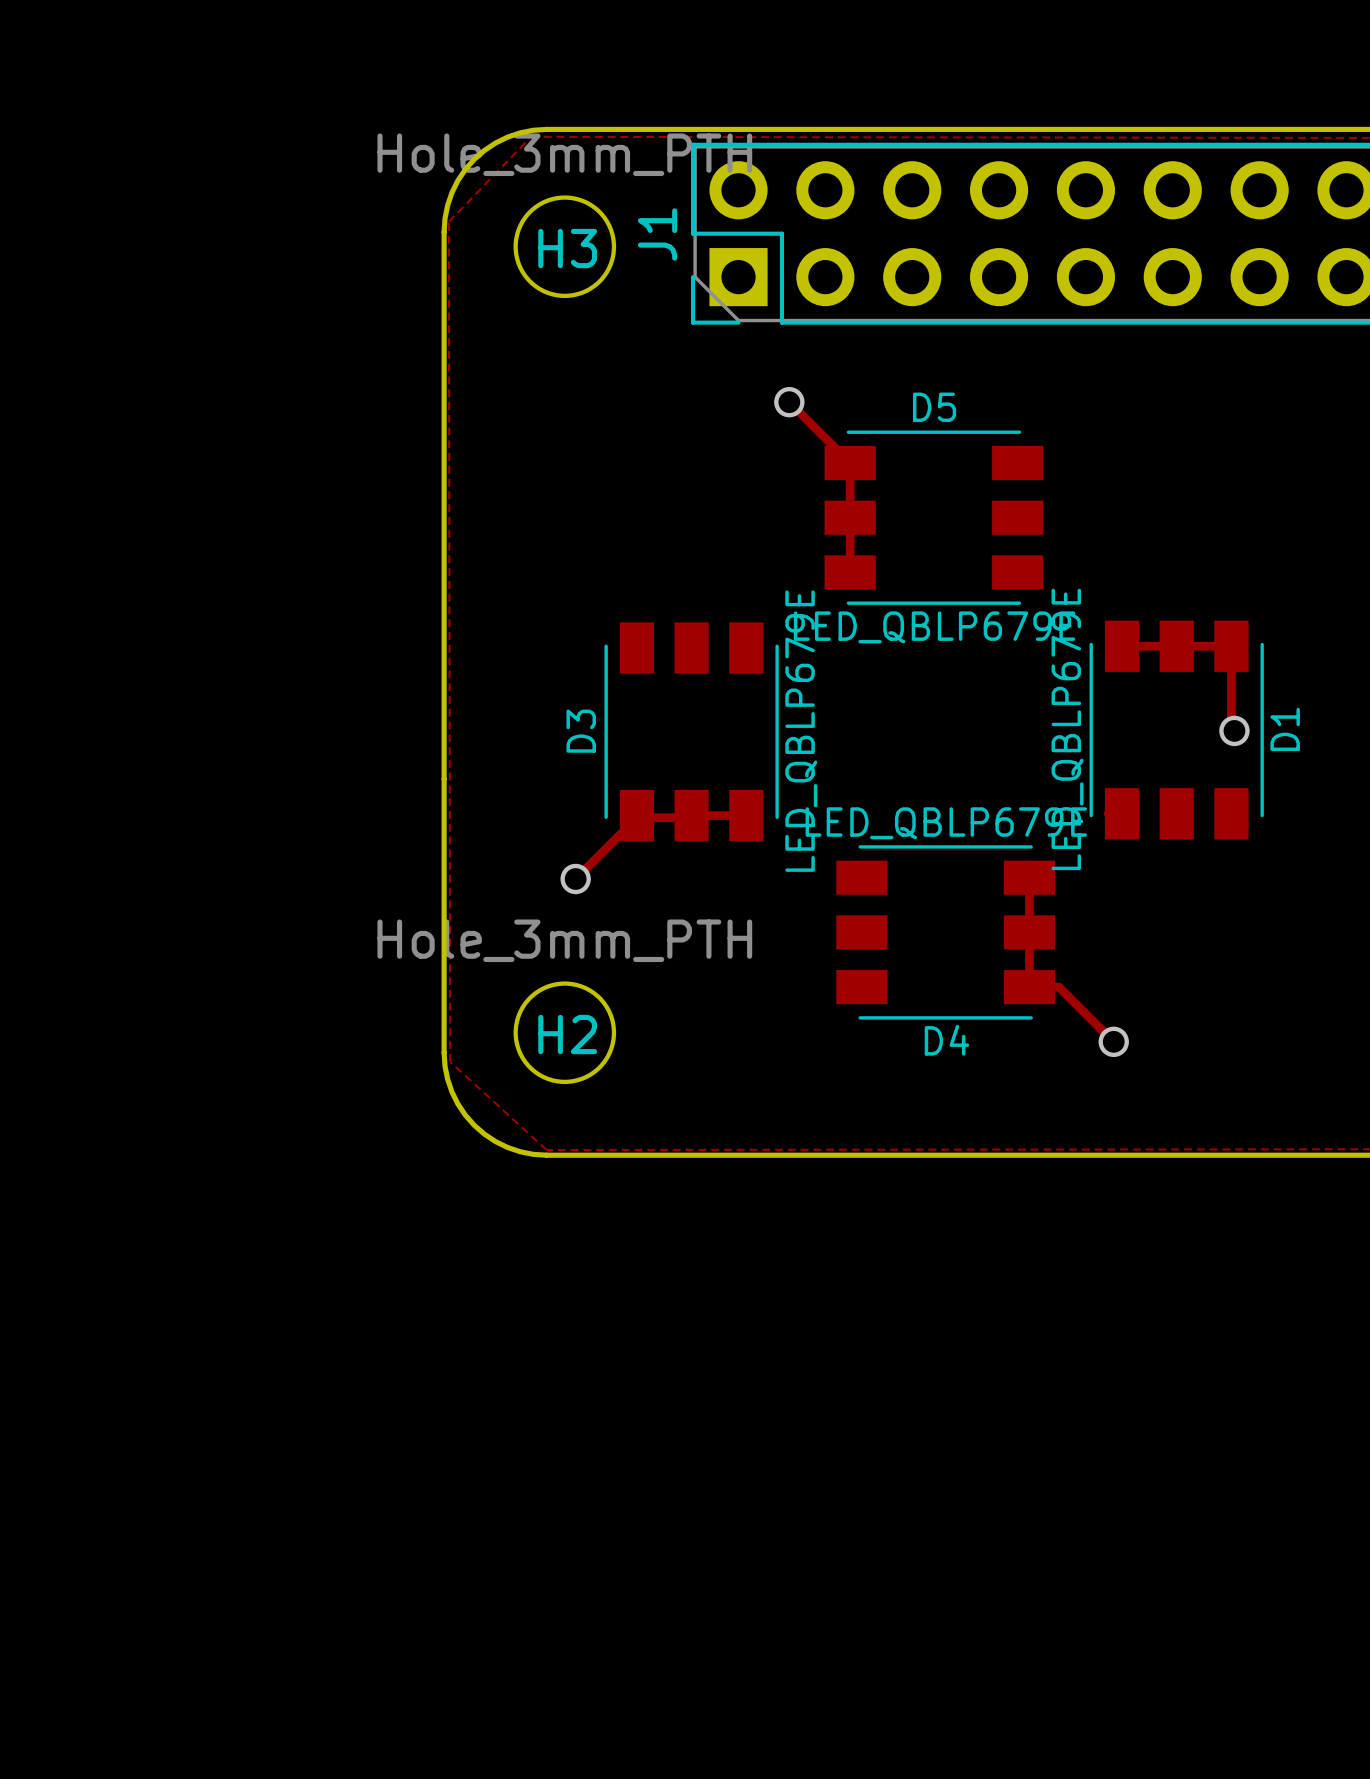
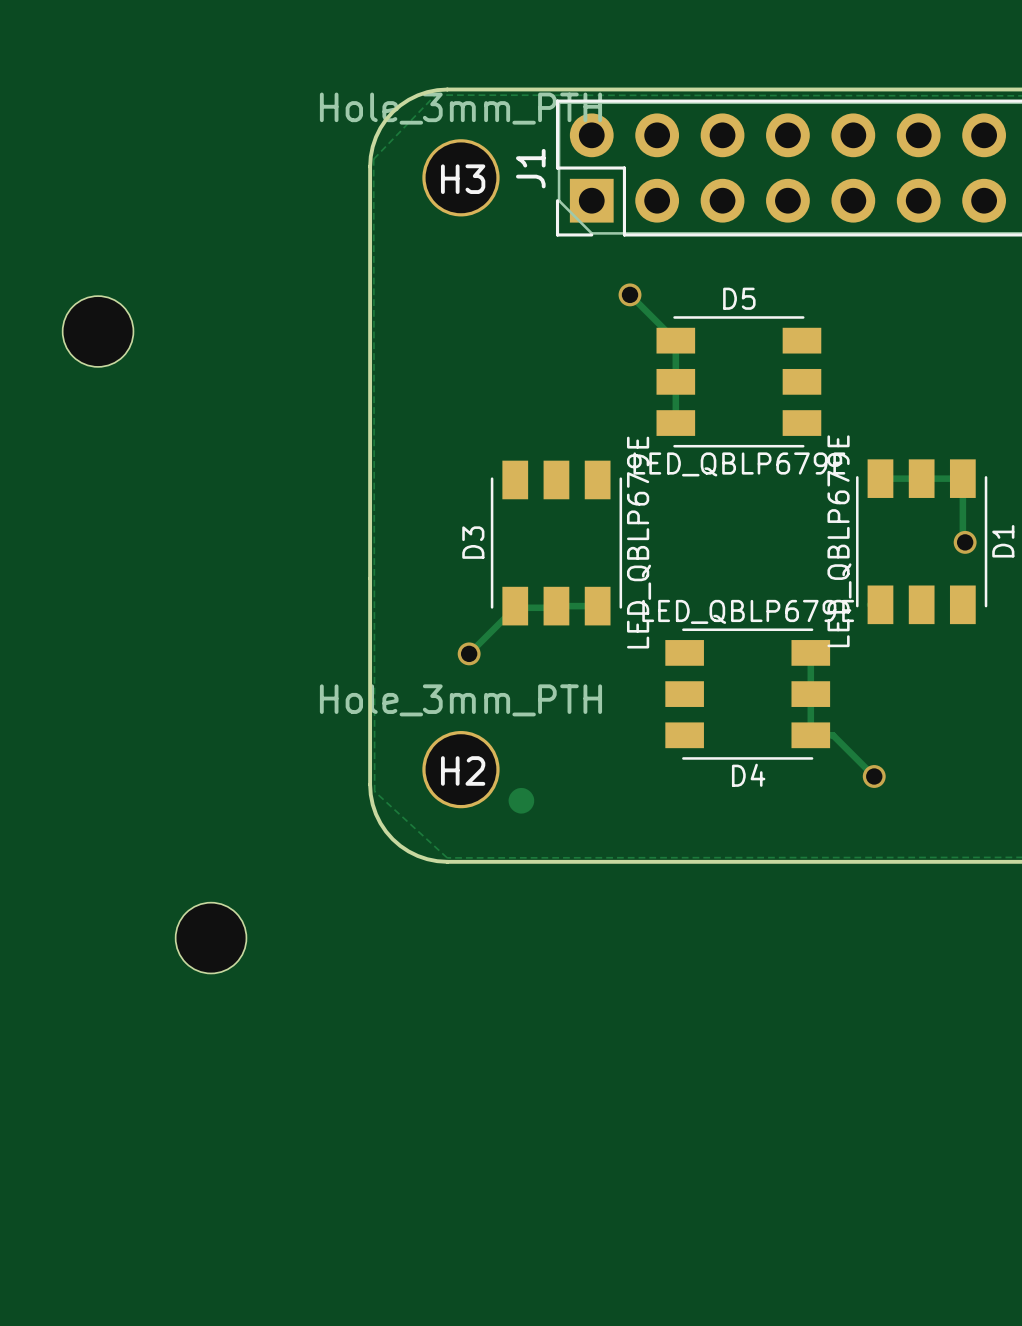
part: none -> (98, 331)
drawing: none -> [508, 787, 535, 814]
part: none -> (211, 938)

